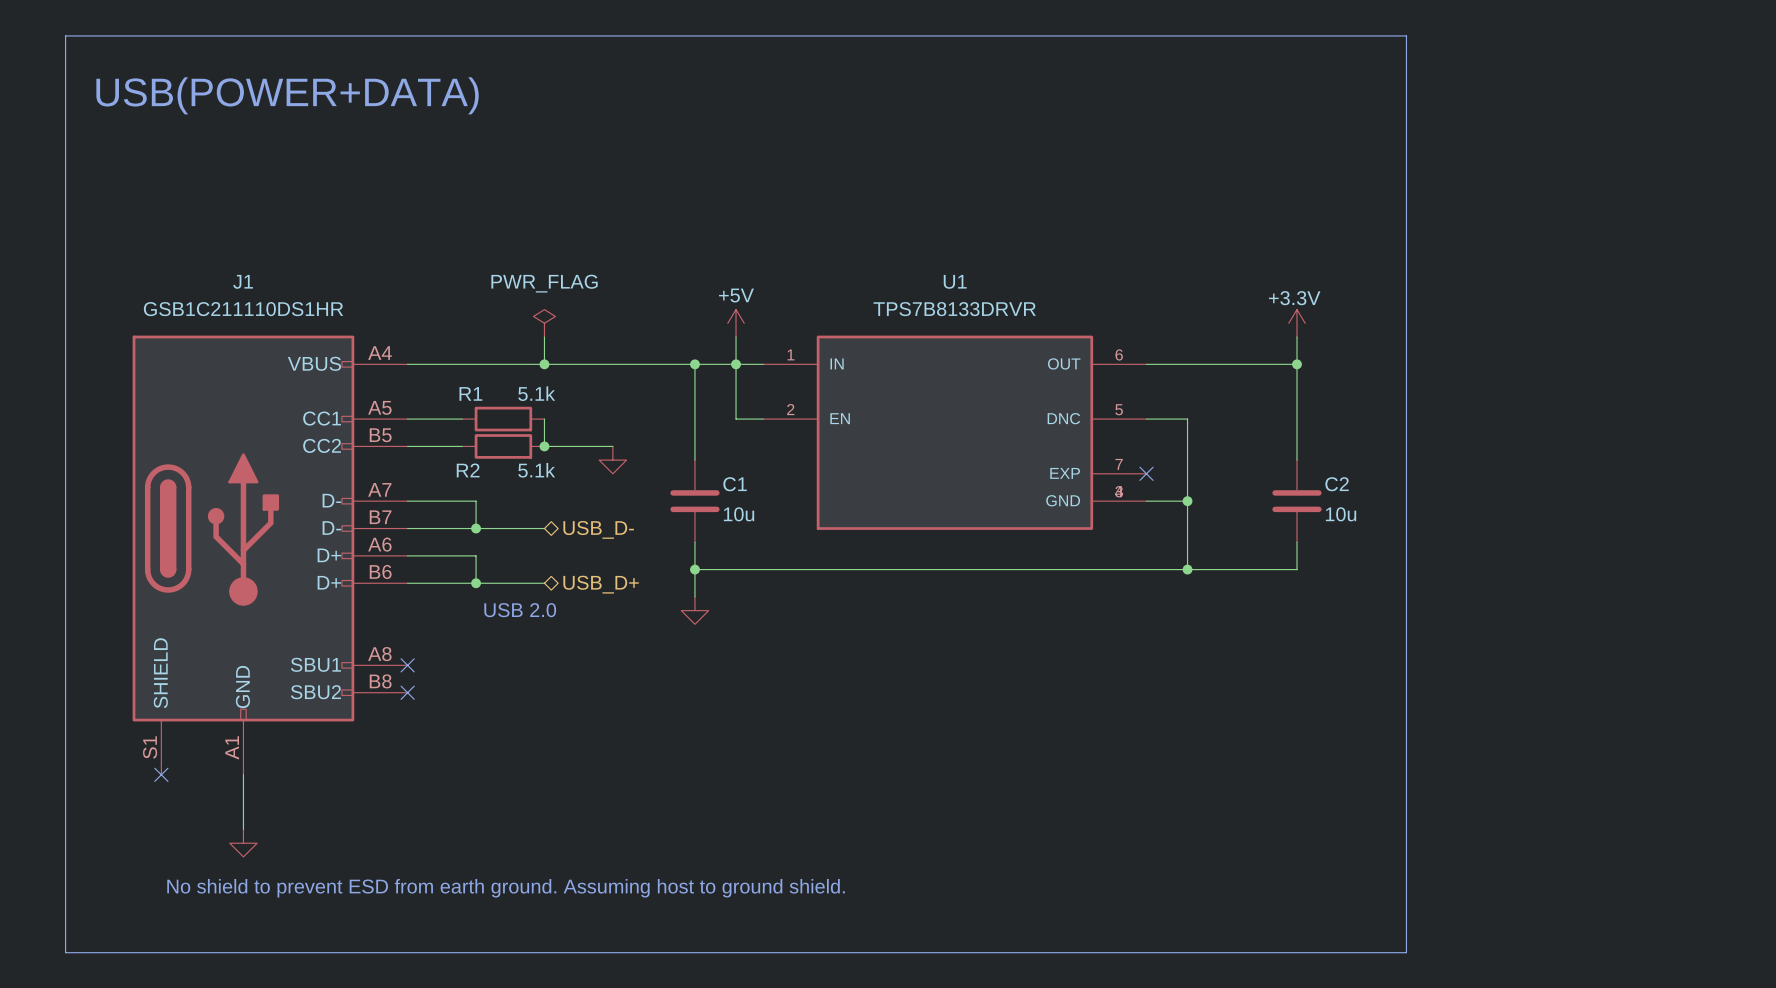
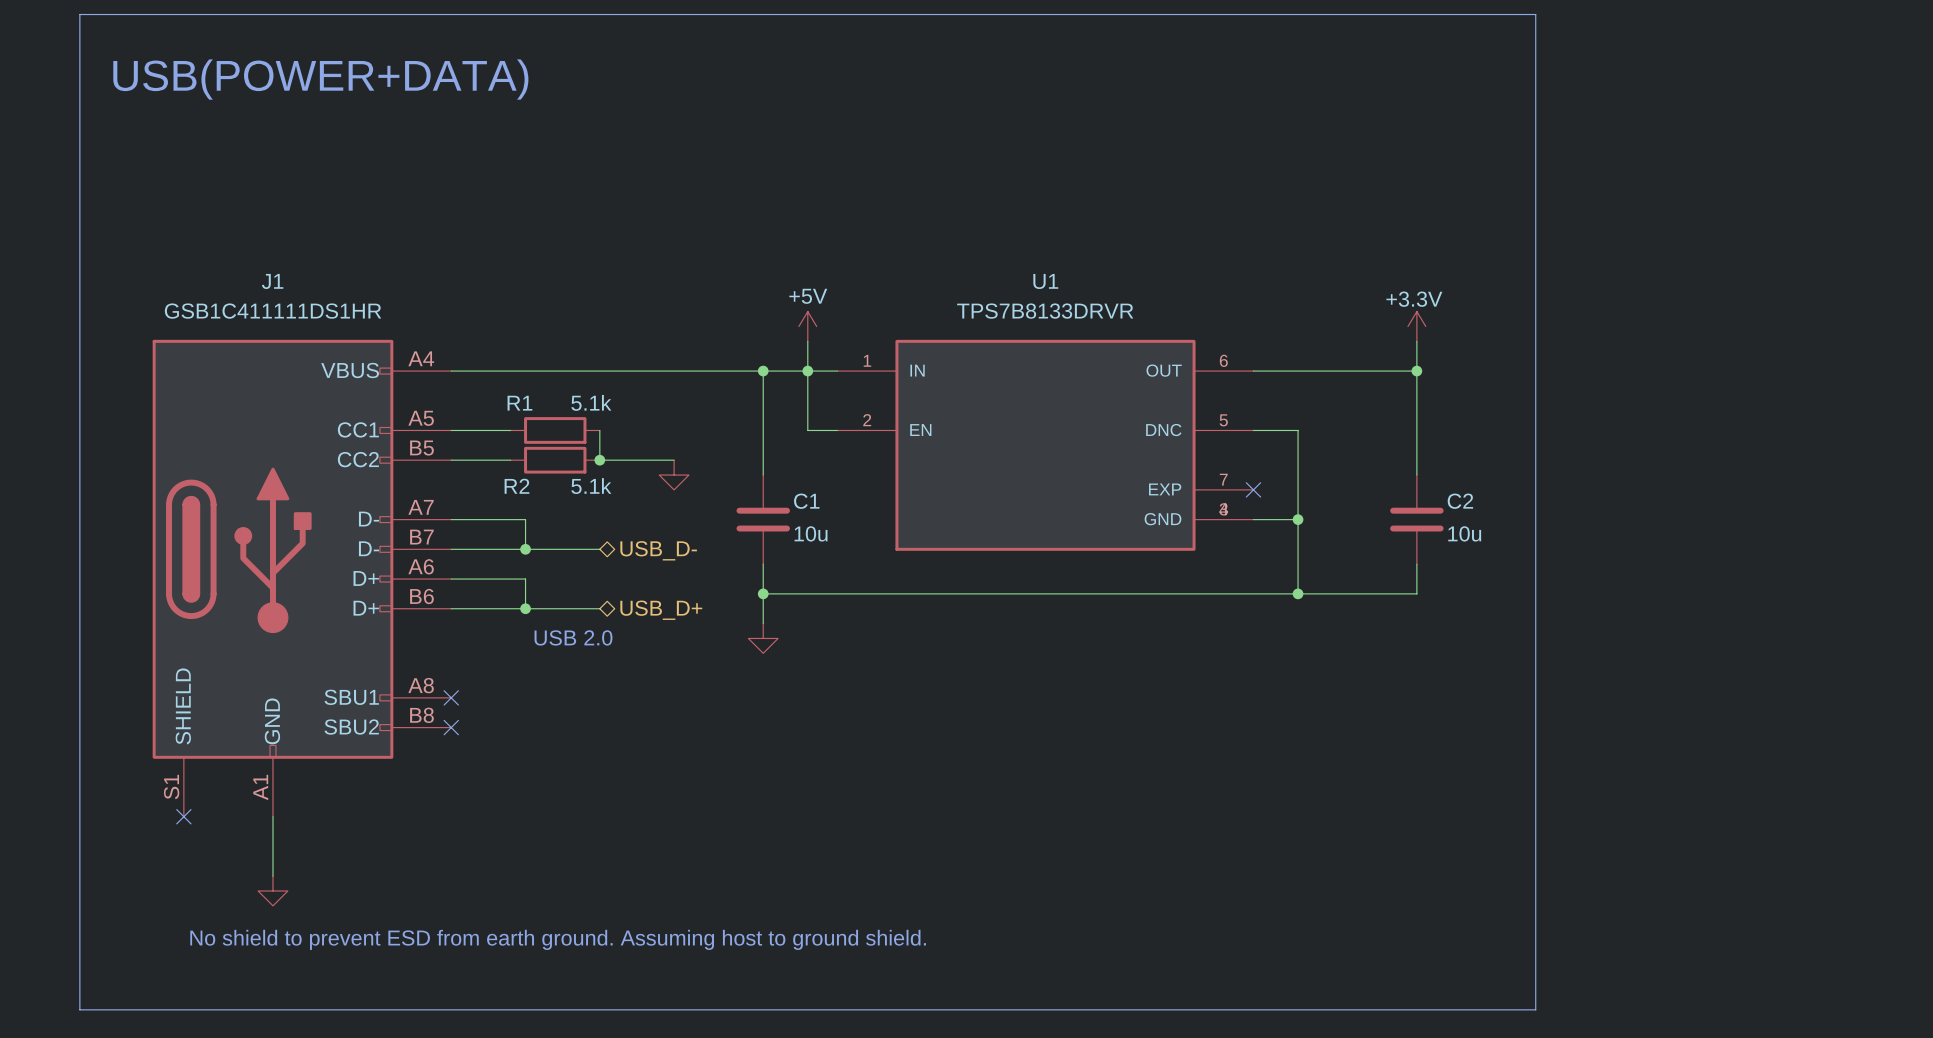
J1 value: GSB1C211110DS1HR (243, 309) -> GSB1C411111DS1HR (273, 311)
power symbol: PWR_FLAG (544, 323) -> none
wire: (544, 336) (544, 364) -> none
junction: (544, 364) -> none

